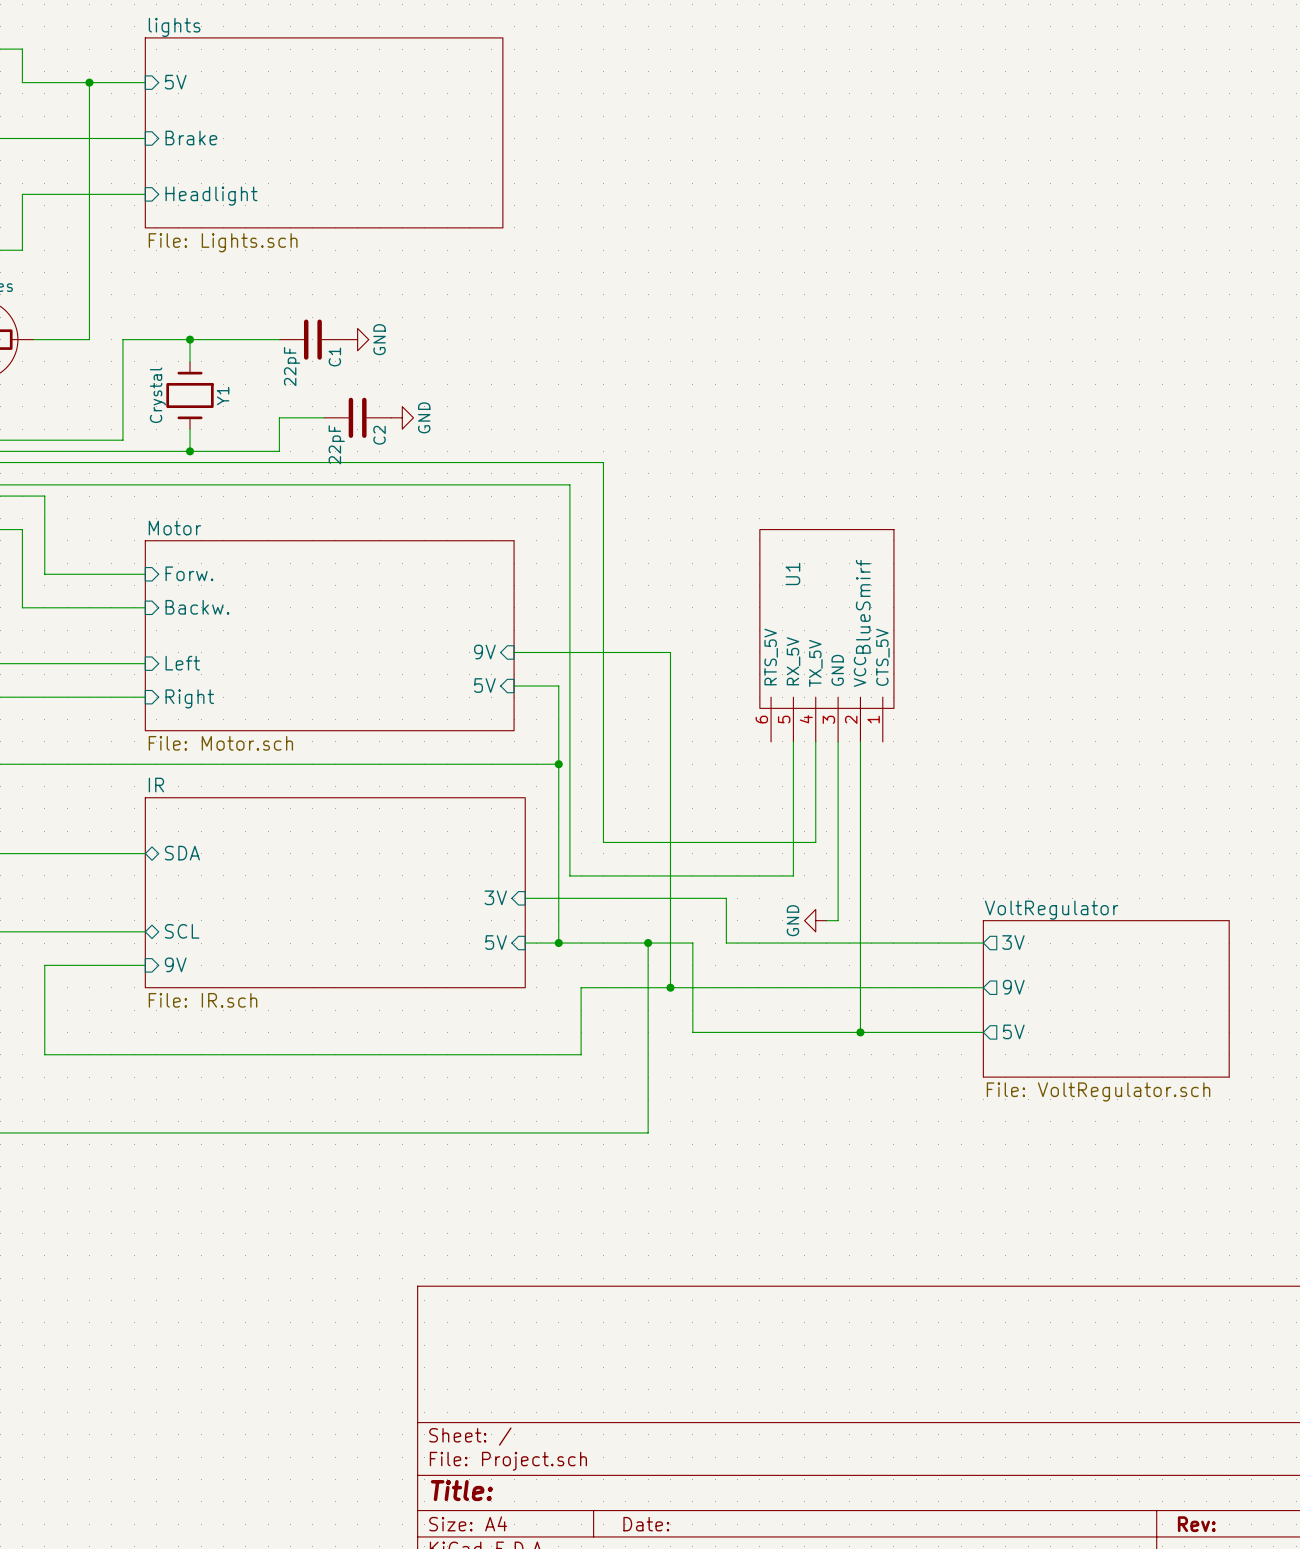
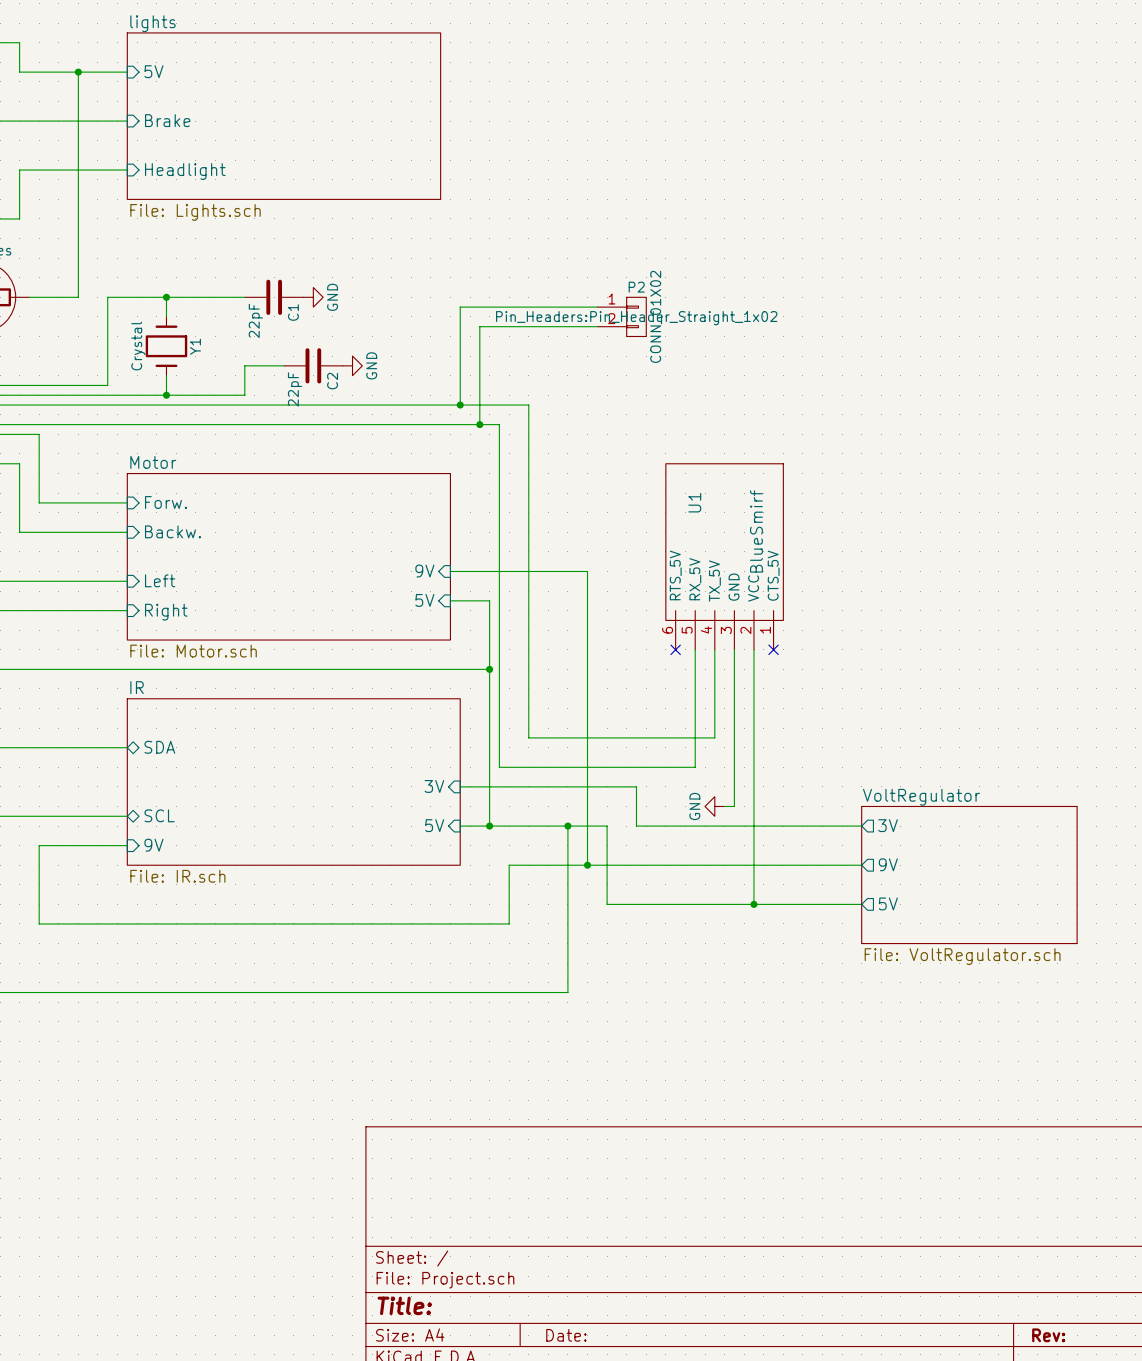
wire: none -> (597, 307) (460, 307) (460, 405)
P2: none -> CONN_01X02 (621, 316)
wire: none -> (597, 326) (479, 326) (479, 424)
junction: none -> (460, 405)
junction: none -> (479, 424)
no-connect mark: none -> (675, 649)
no-connect mark: none -> (773, 649)

